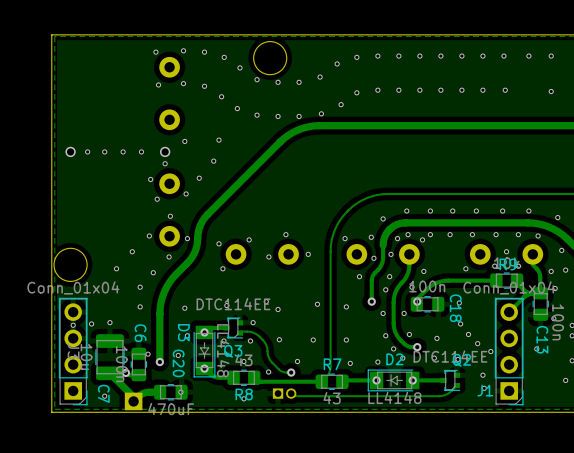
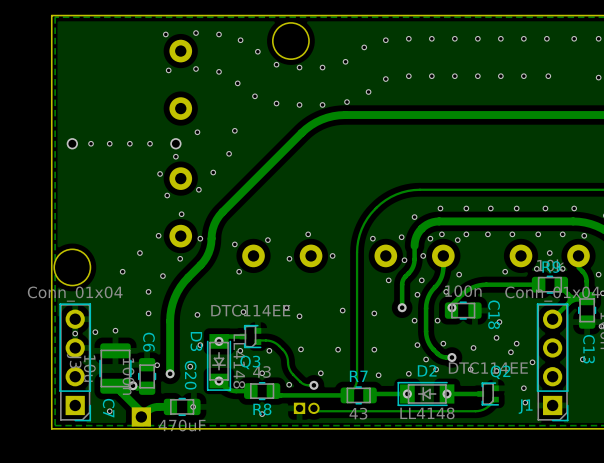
via: (459, 302) -> none
via: none -> (499, 322)
via: (253, 322) -> none
via: (460, 323) -> none
via: none -> (496, 337)
via: (468, 334) -> none
via: none -> (516, 343)
via: none -> (510, 352)
via: (477, 343) -> none

